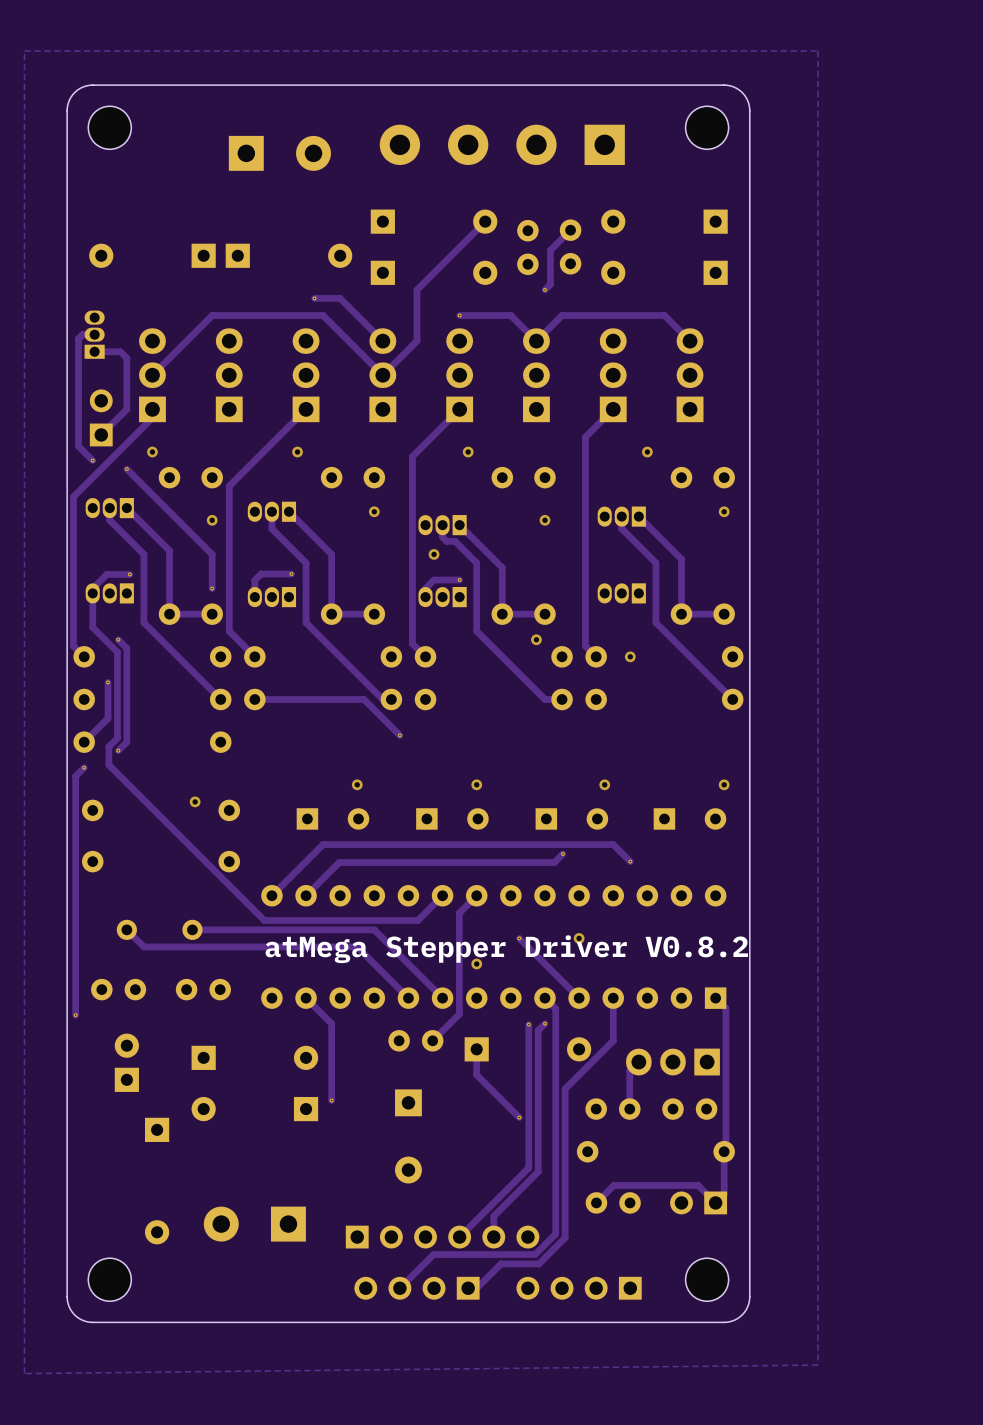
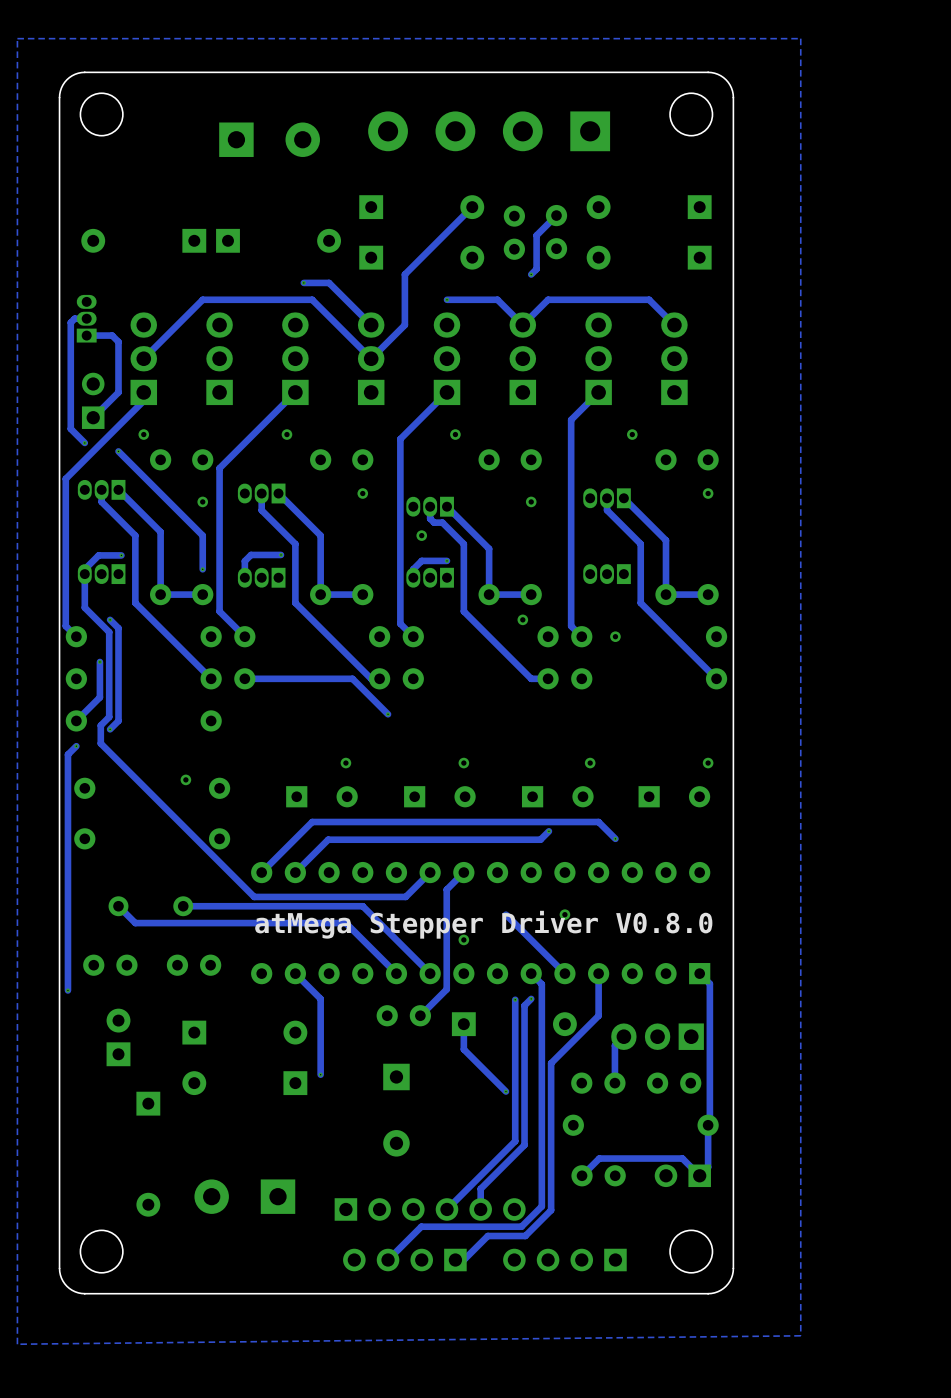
text: atMega Stepper Driver V0.8.2 (506, 949) -> atMega Stepper Driver V0.8.0 (483, 924)

